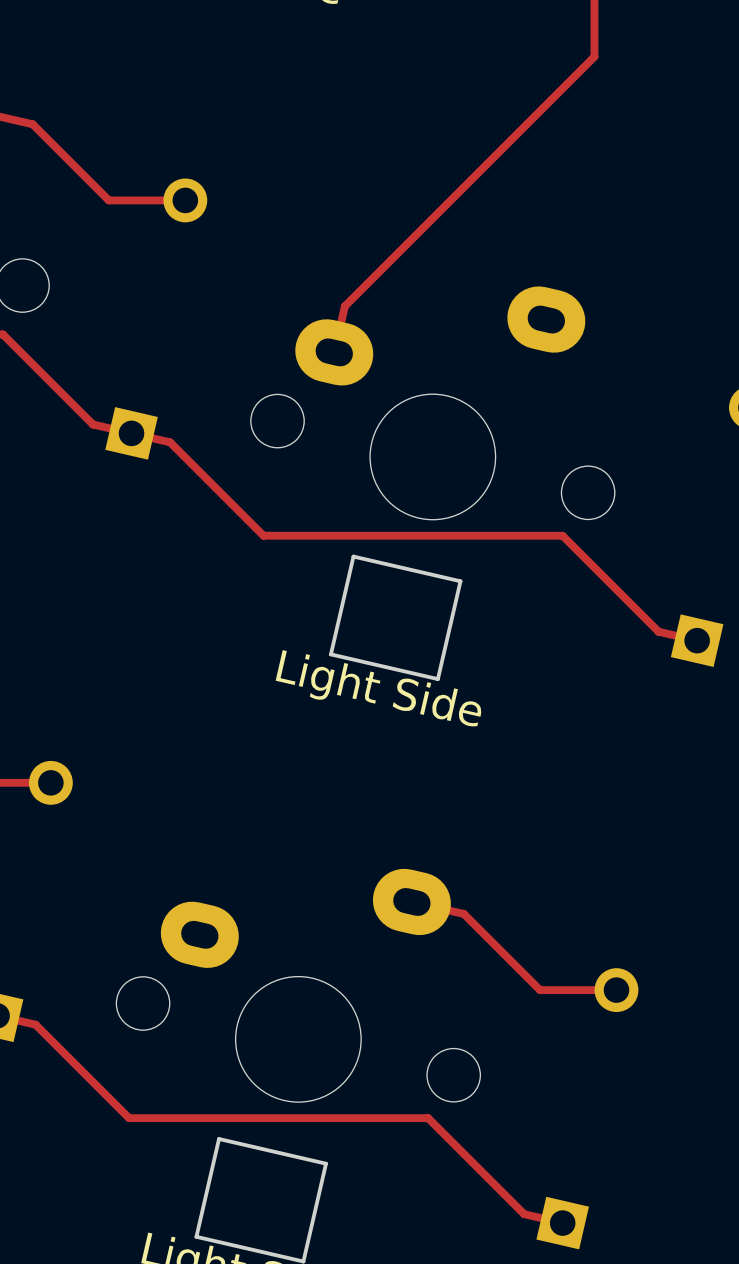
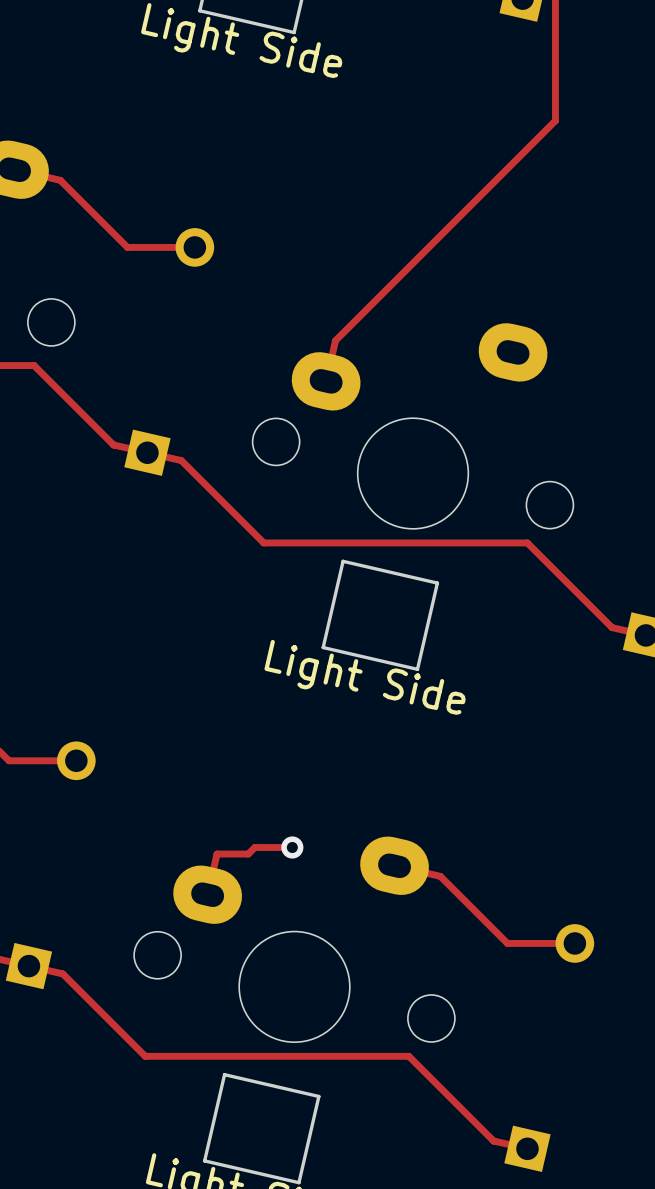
track: none -> (292, 847) (254, 847) (248, 854) (217, 854) (207, 894)
via: none -> (292, 847)

